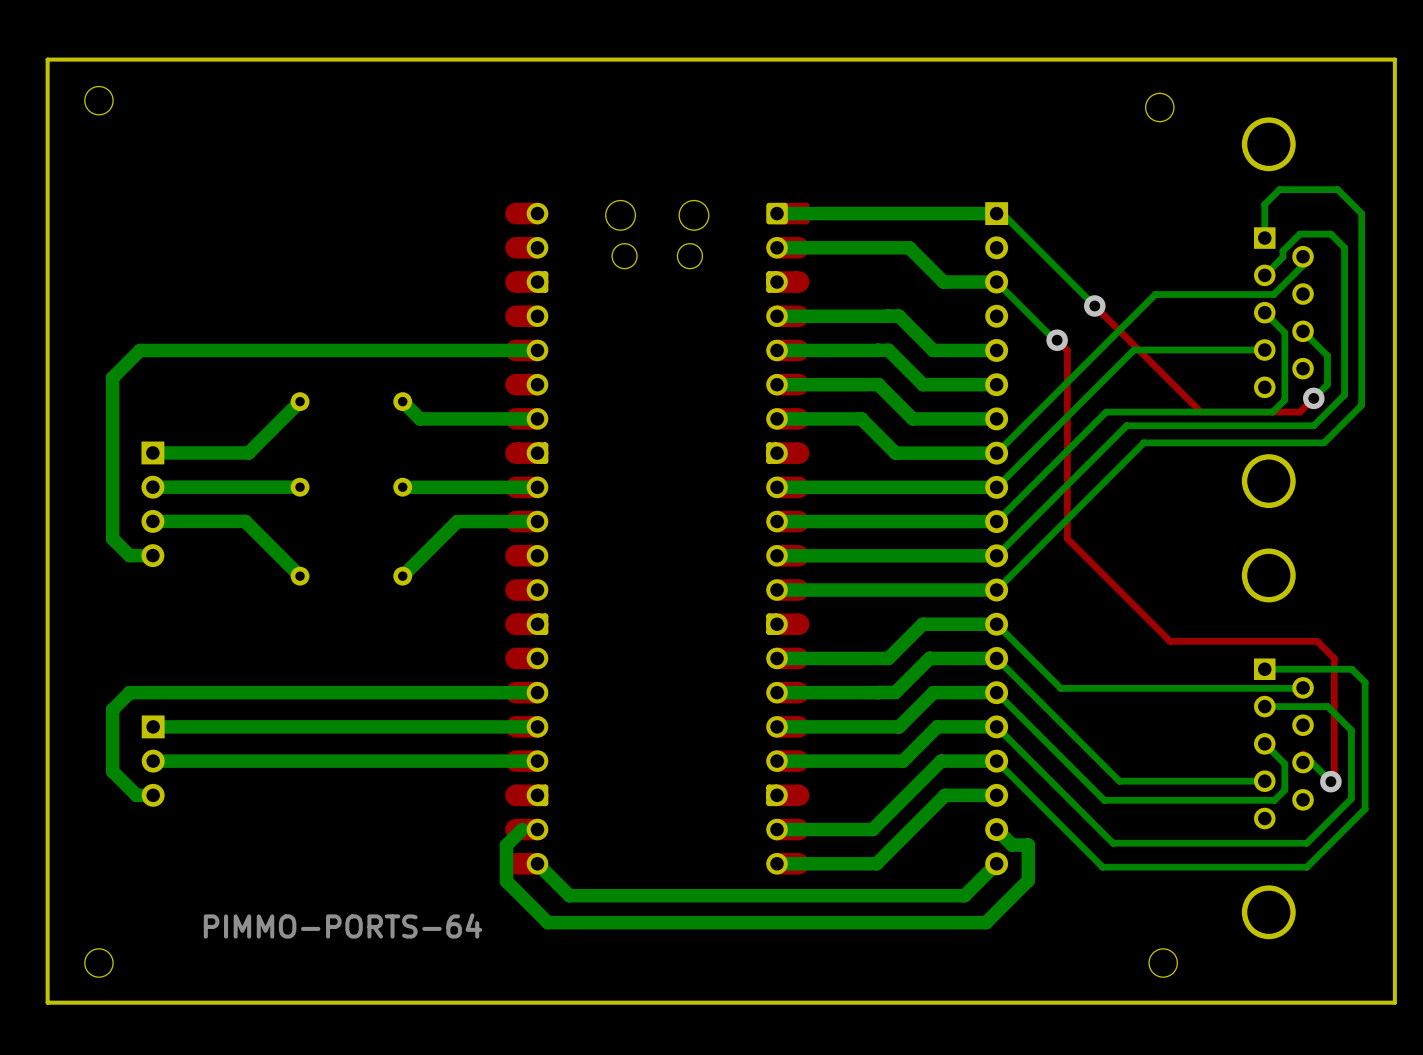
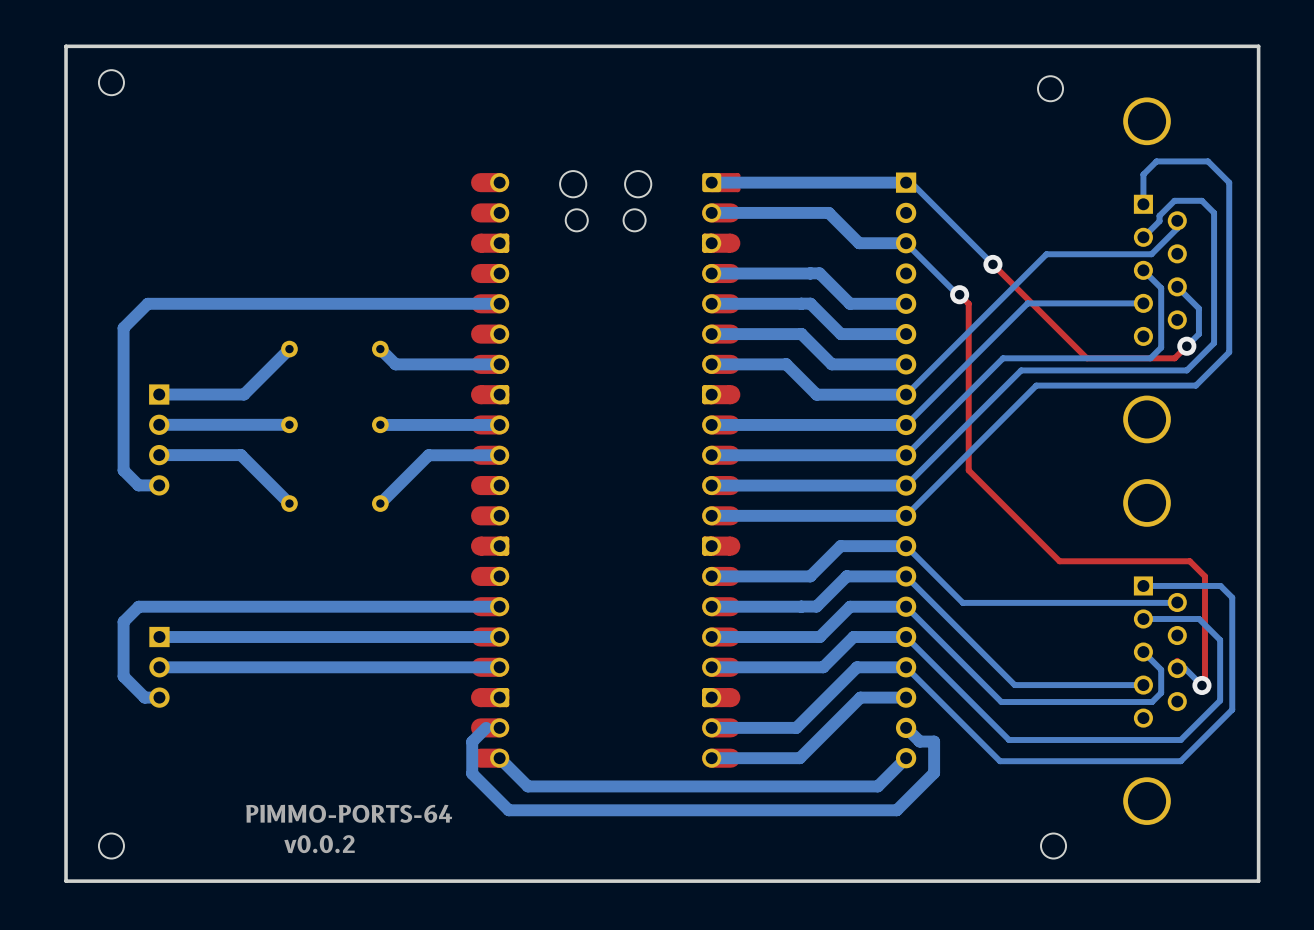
text: none -> v0.0.2 (319, 844)

